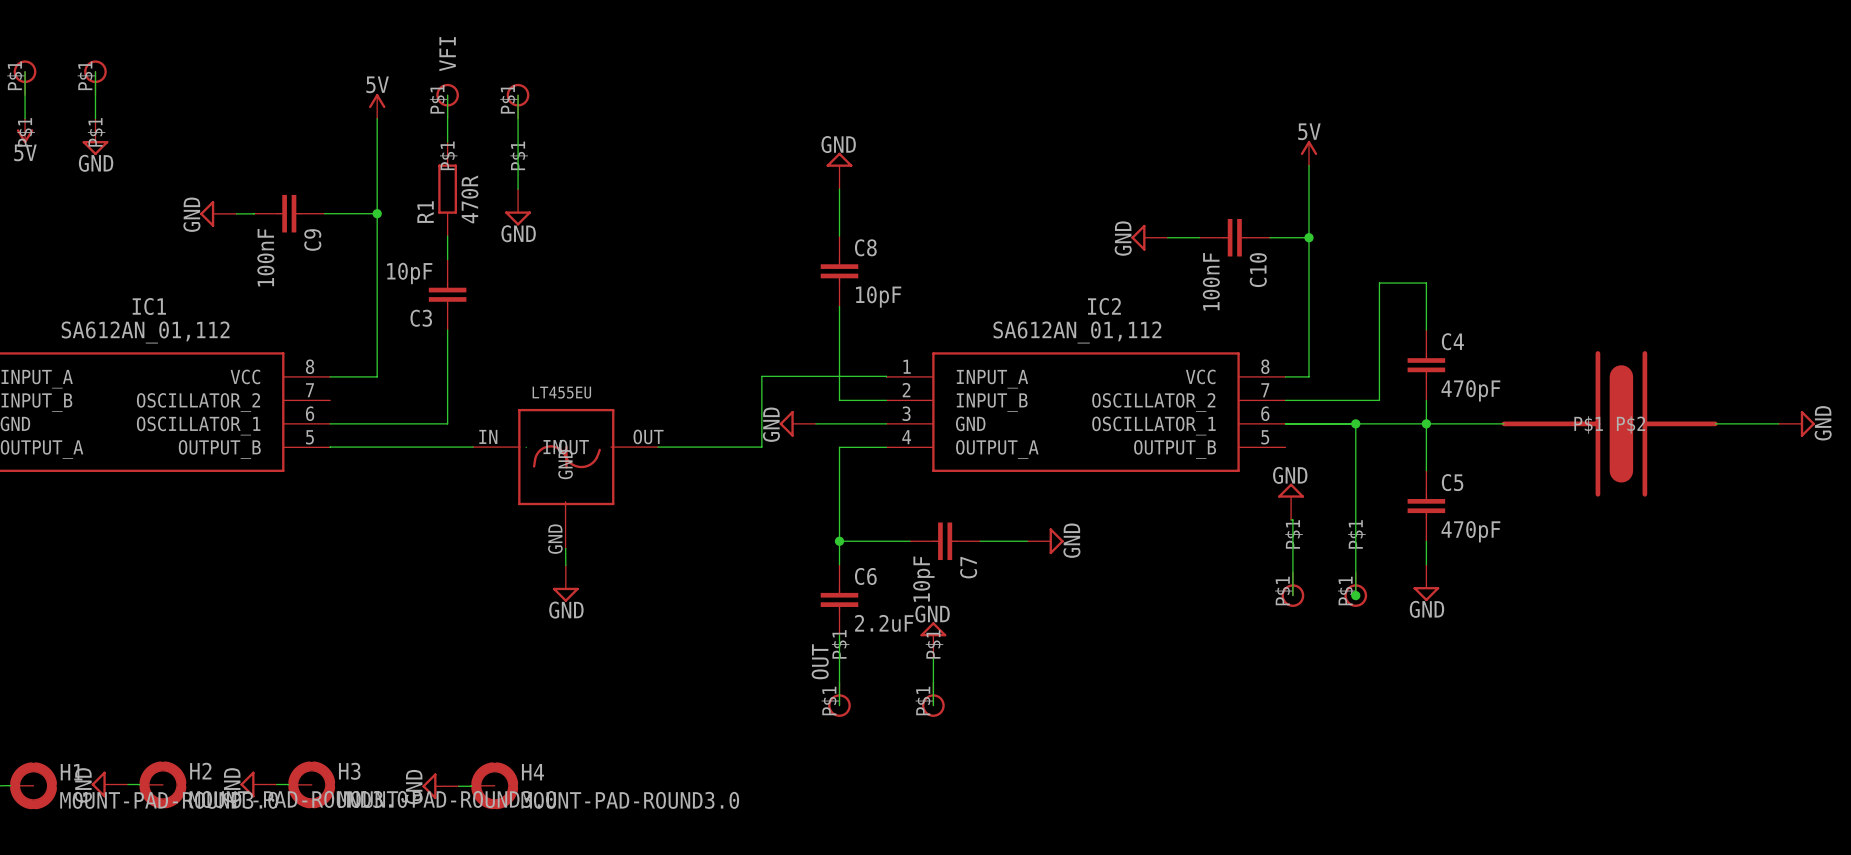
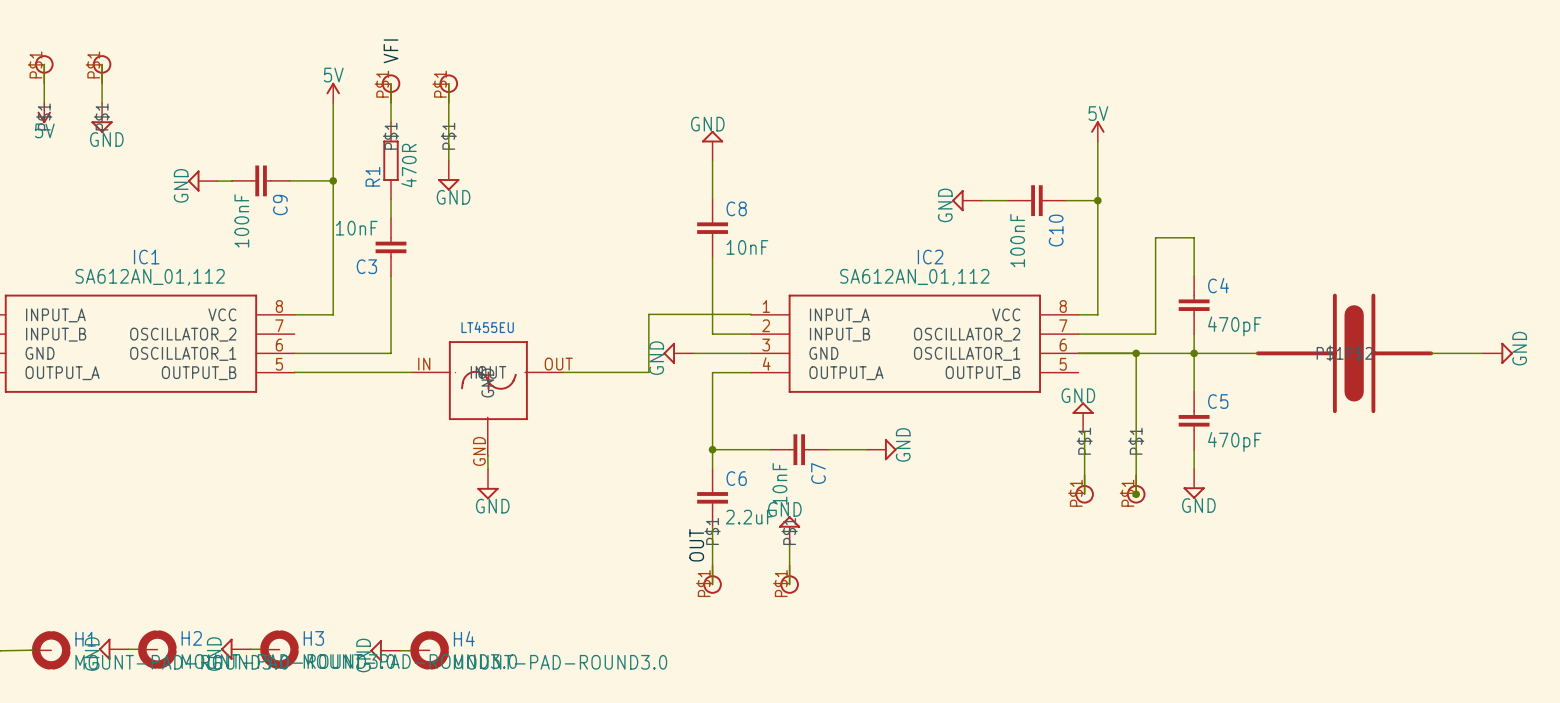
C3 value: 10pF (409, 273) -> 10nF (356, 228)
C8 value: 10pF (878, 296) -> 10nF (747, 247)
C7 value: 10pF (923, 579) -> 10nF (779, 483)

